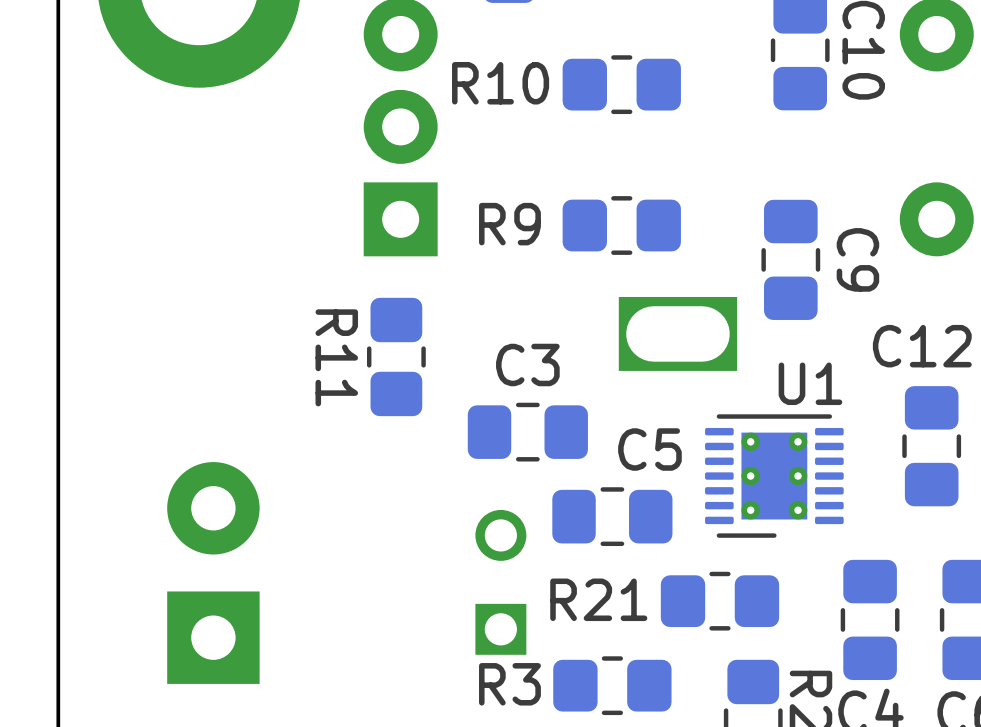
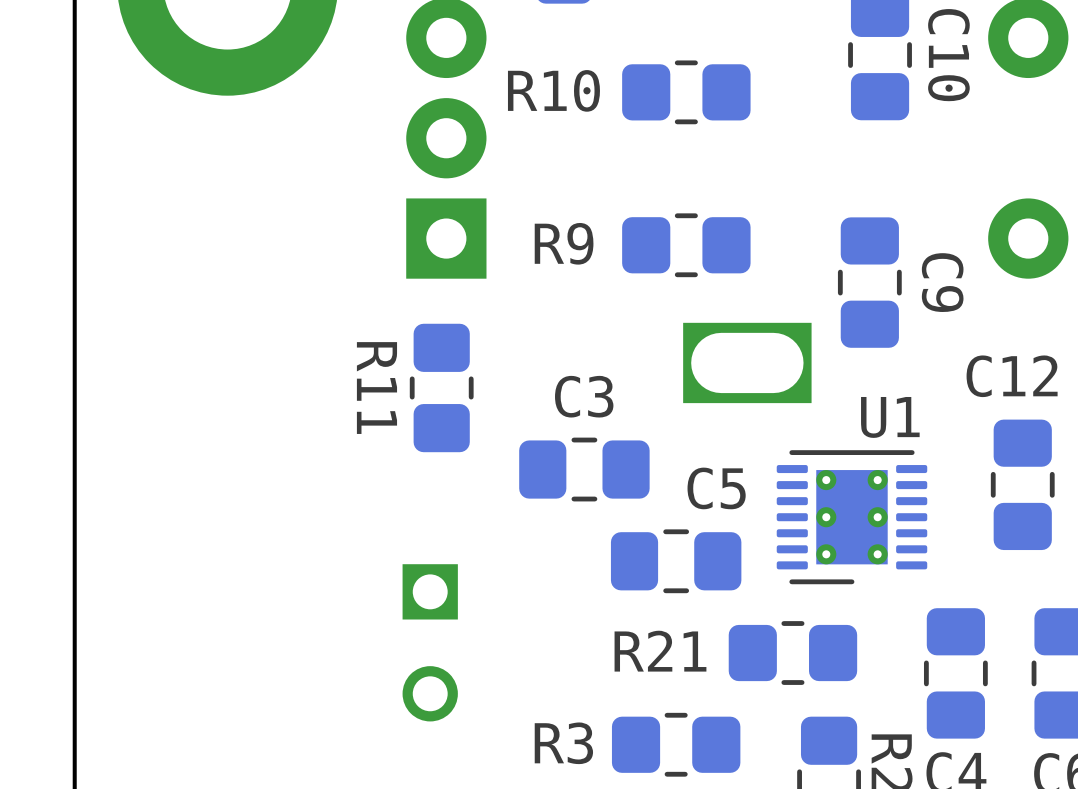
part: (213, 572) -> none
part rotation: 0° (500, 582) -> 180° (430, 642)
part position: (500, 582) -> (430, 642)

